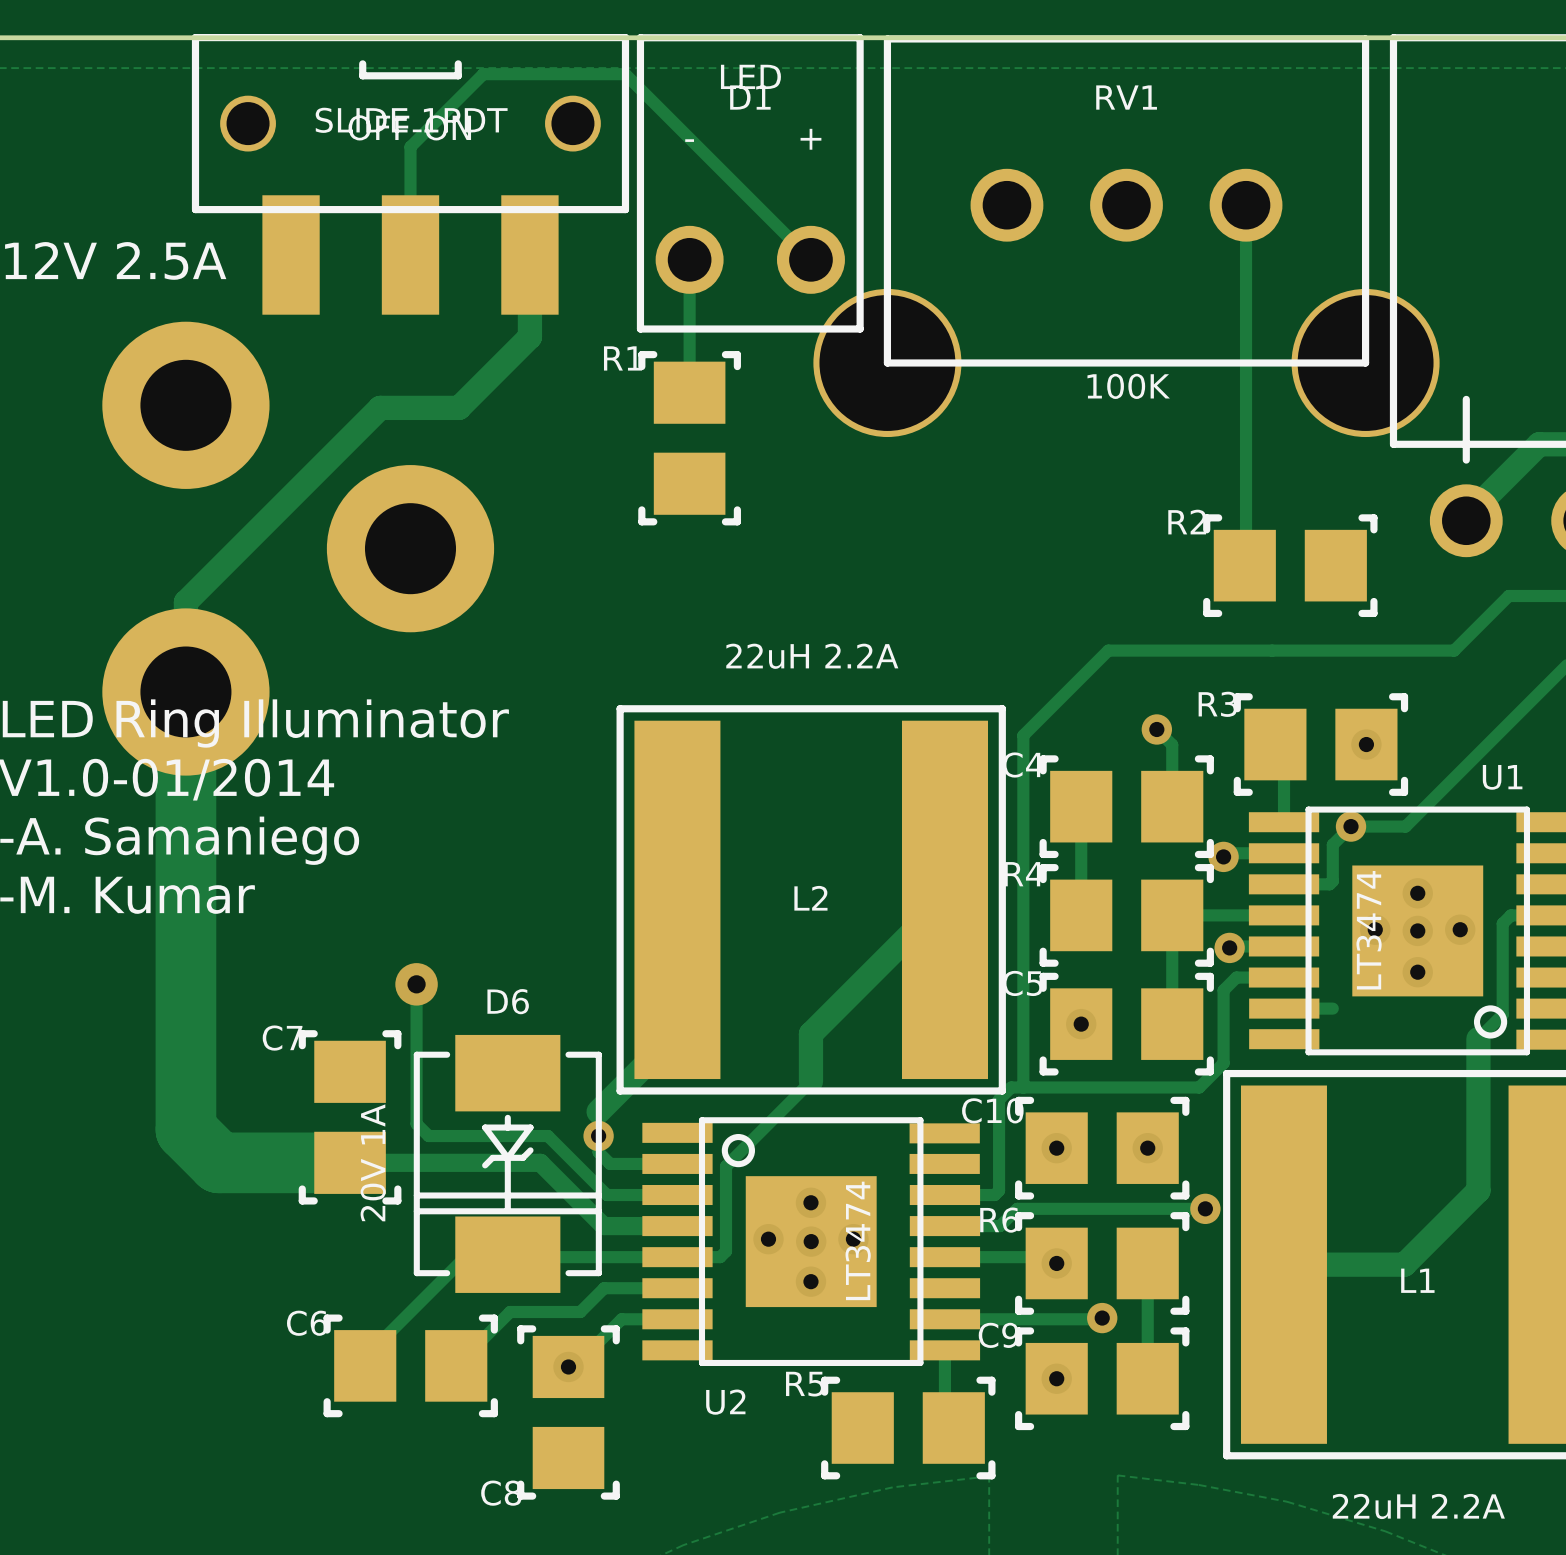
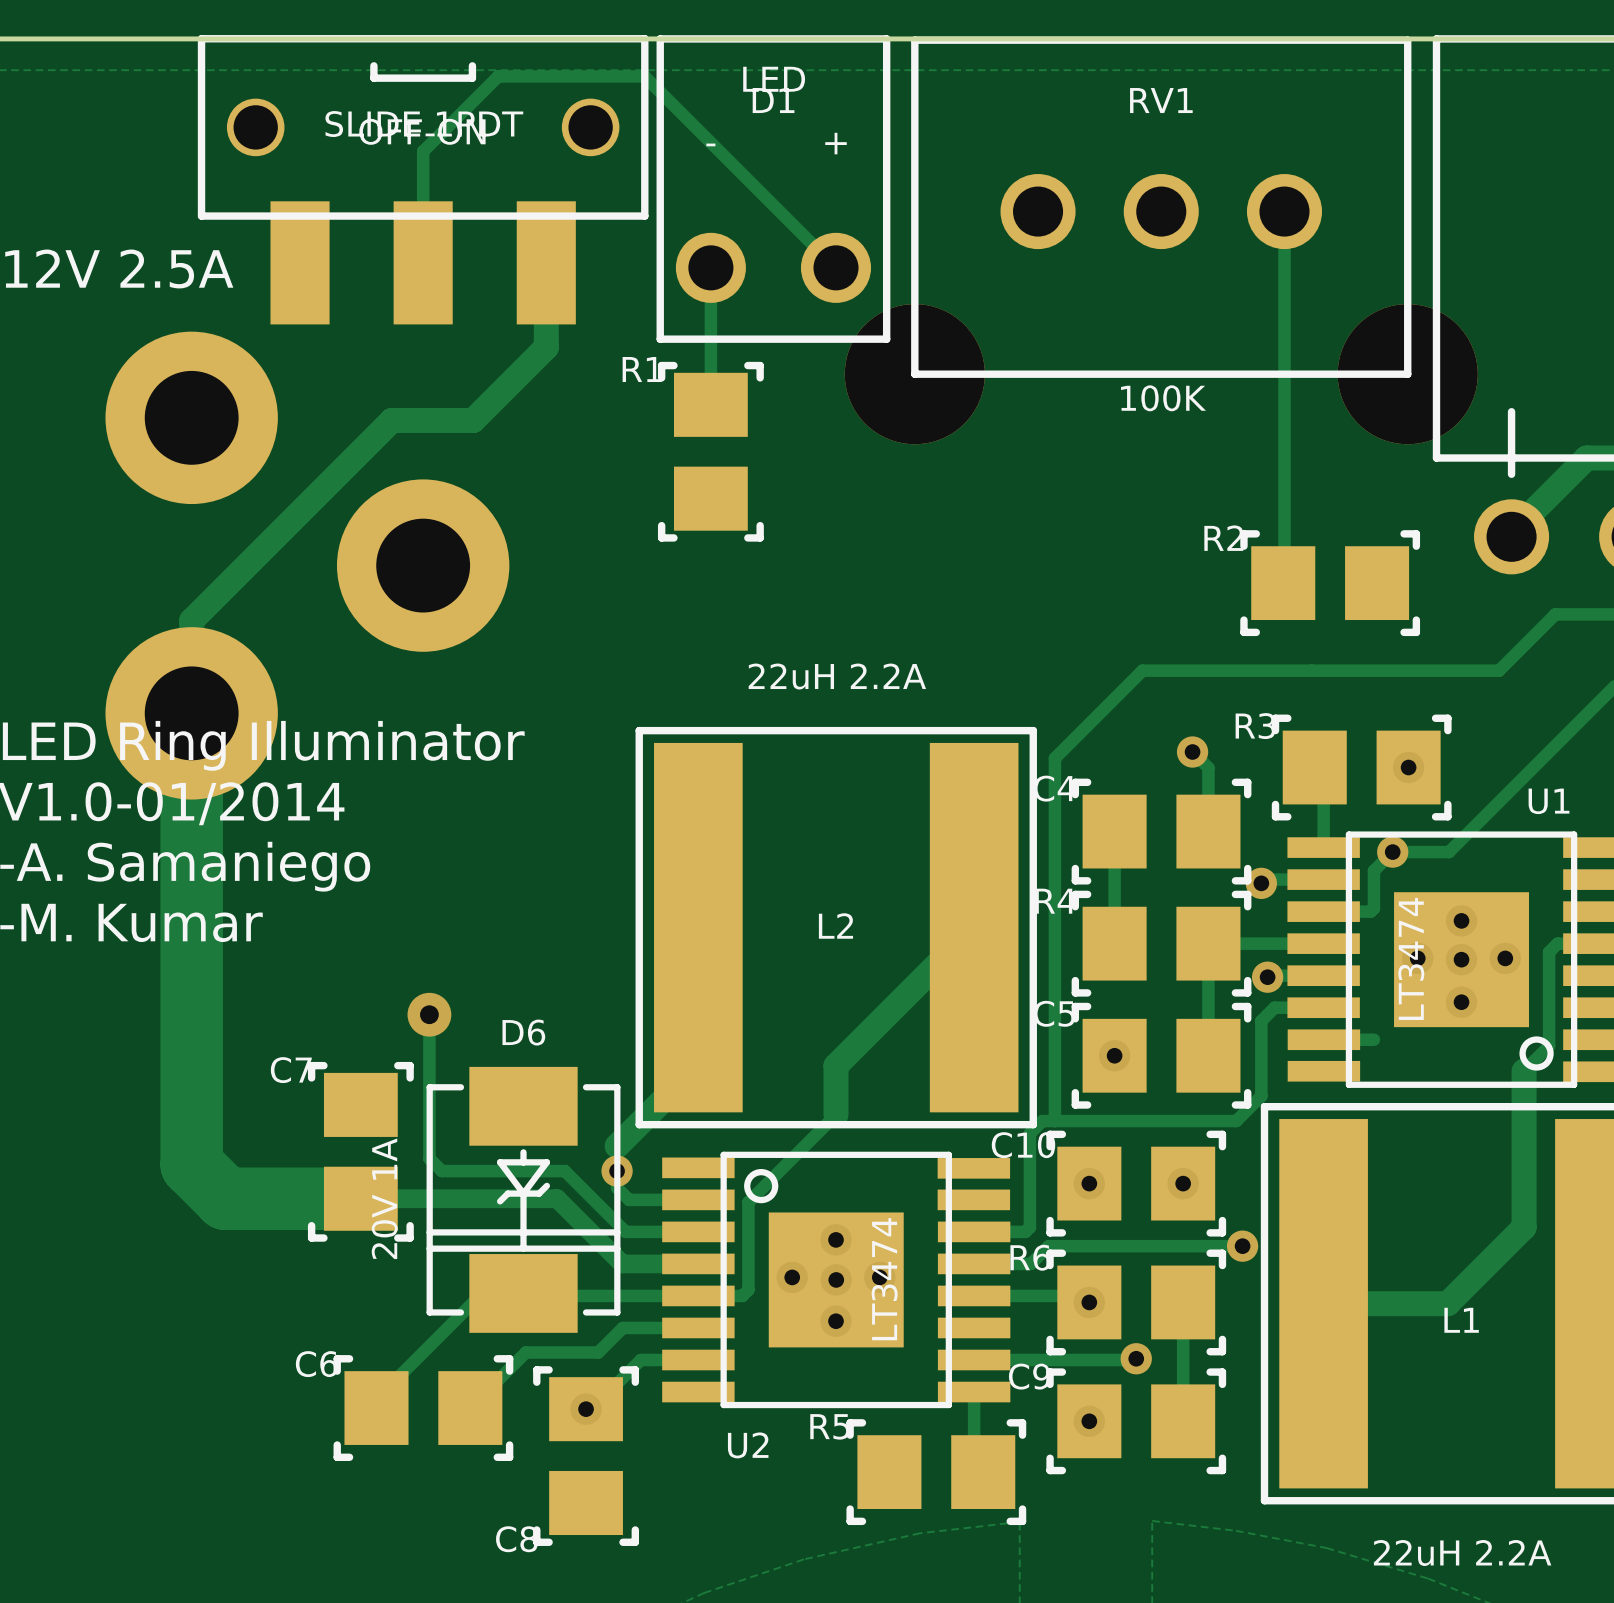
RV1 footprint: [813, 35, 1440, 438] -> [844, 36, 1478, 445]

